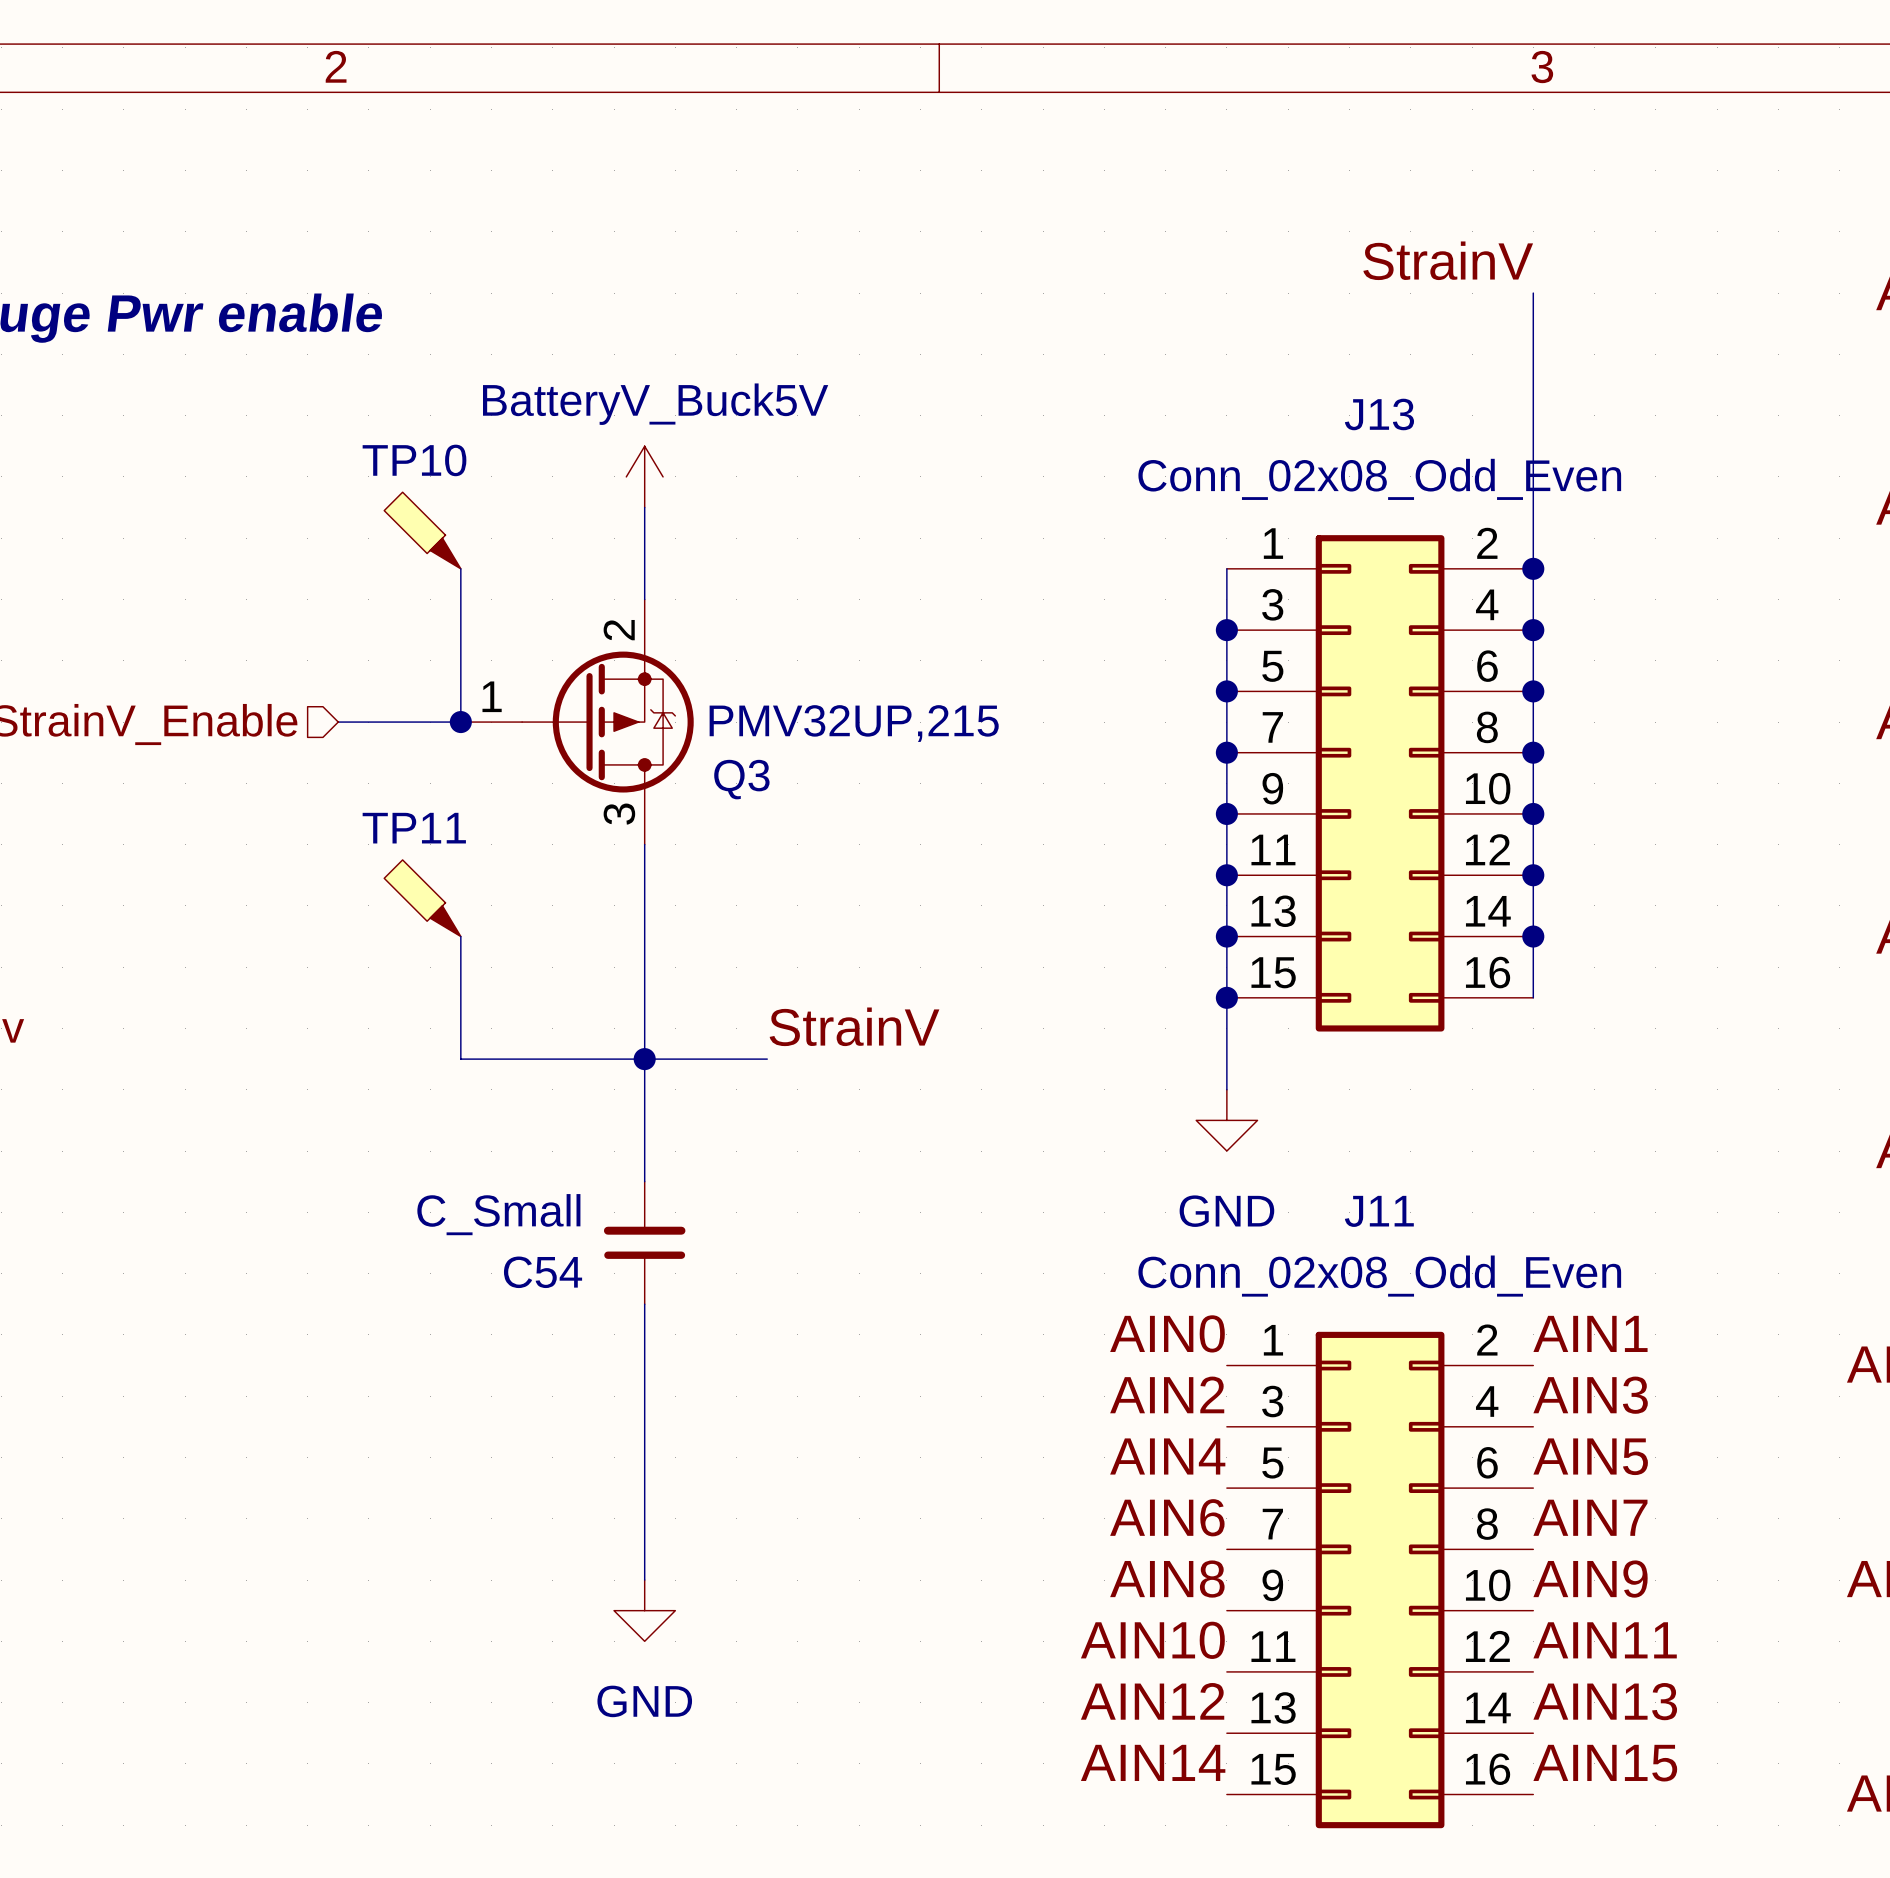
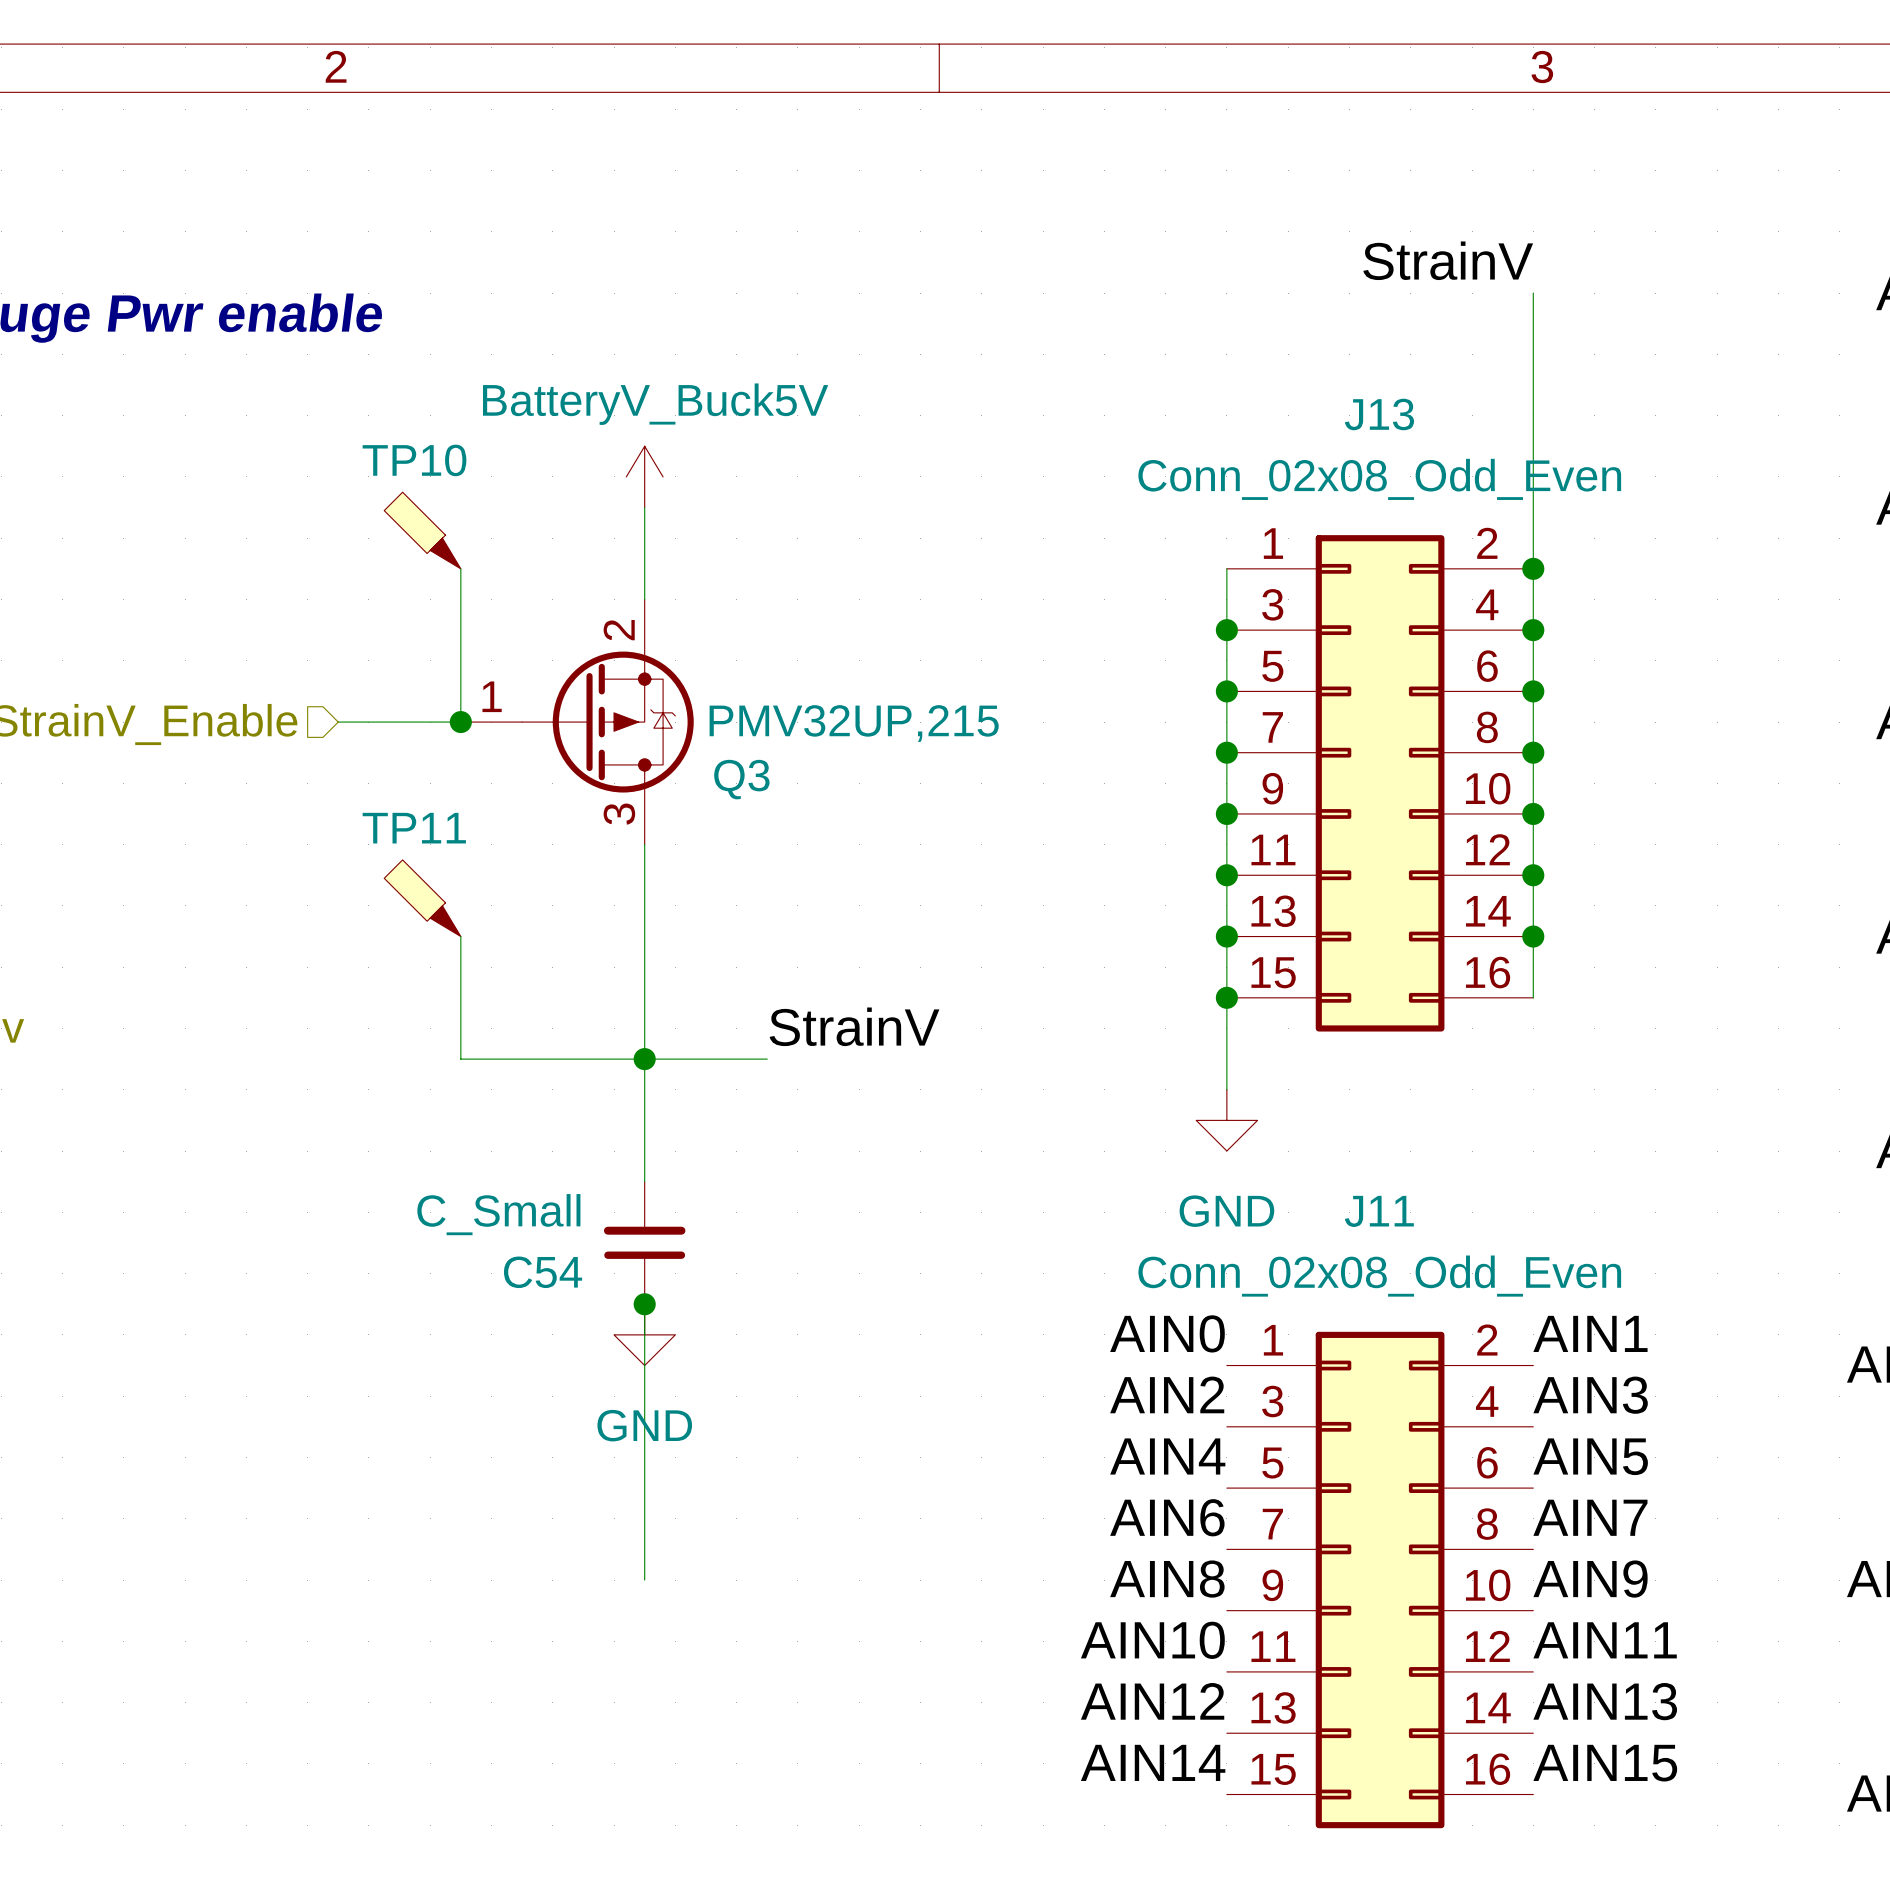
junction: none -> (644, 1304)
power symbol position: GND (644, 1610) -> GND (644, 1334)

